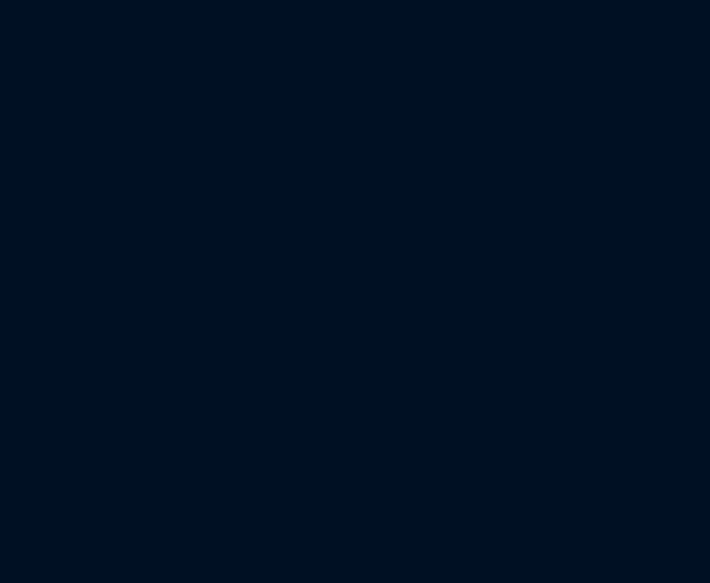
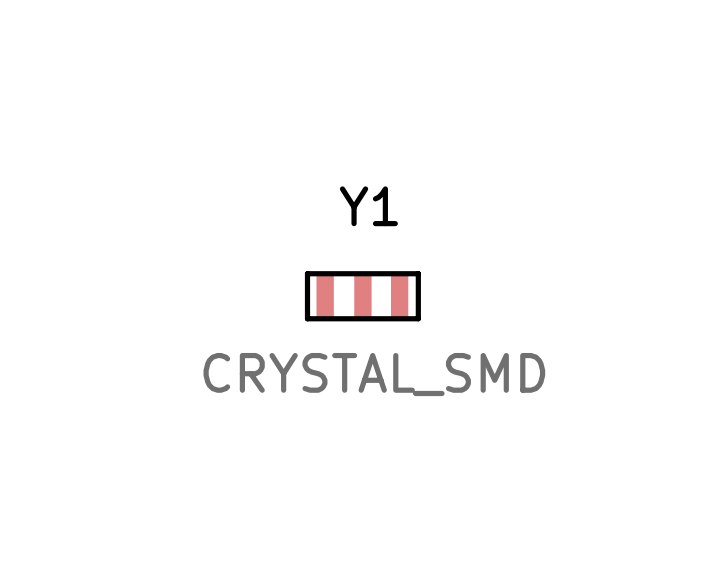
Y1: none -> CRYSTAL_SMD (362, 296)

